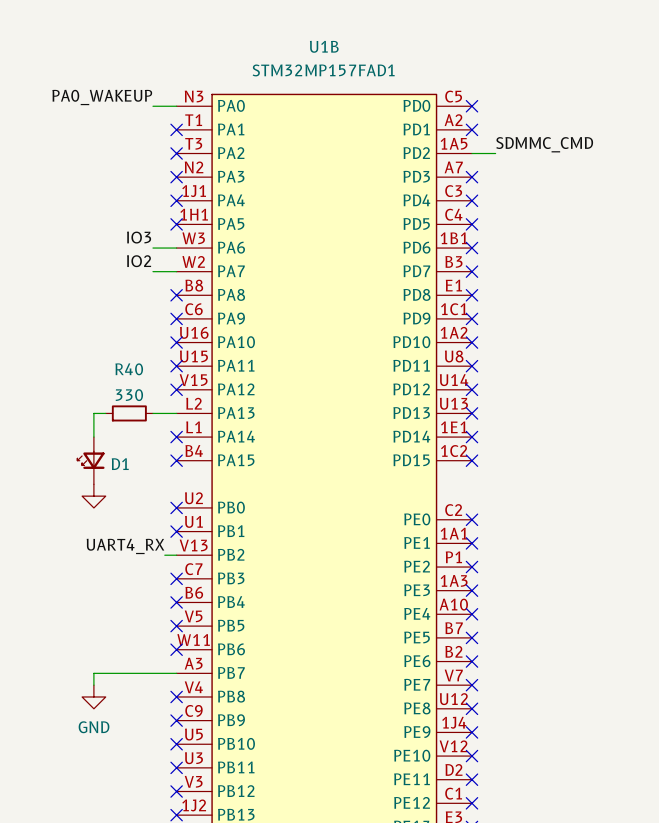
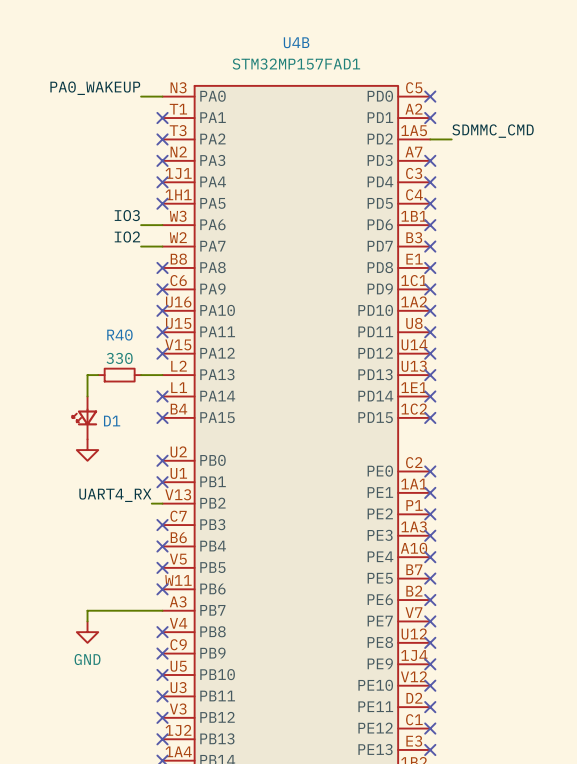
U1B name: U1B (324, 46) -> U4B (296, 42)

